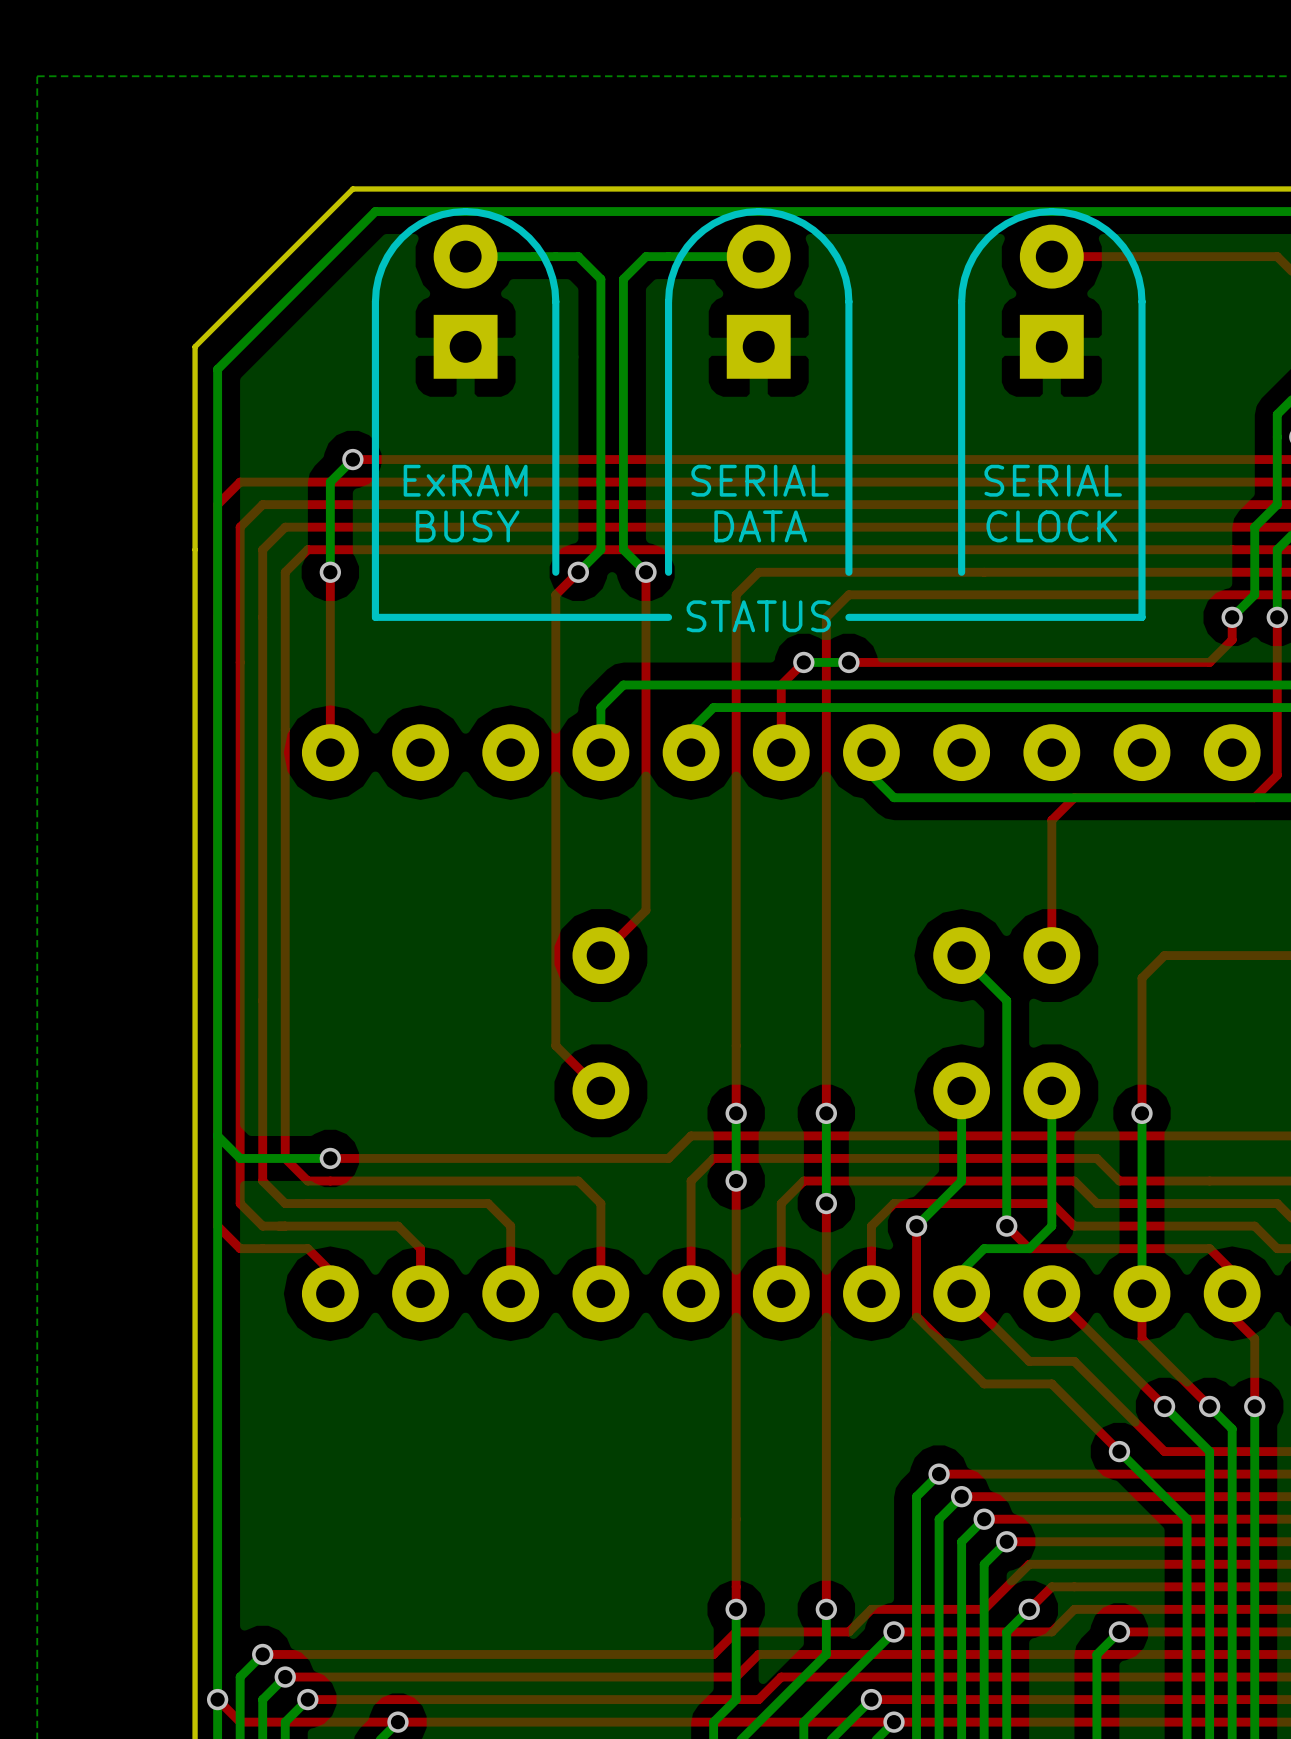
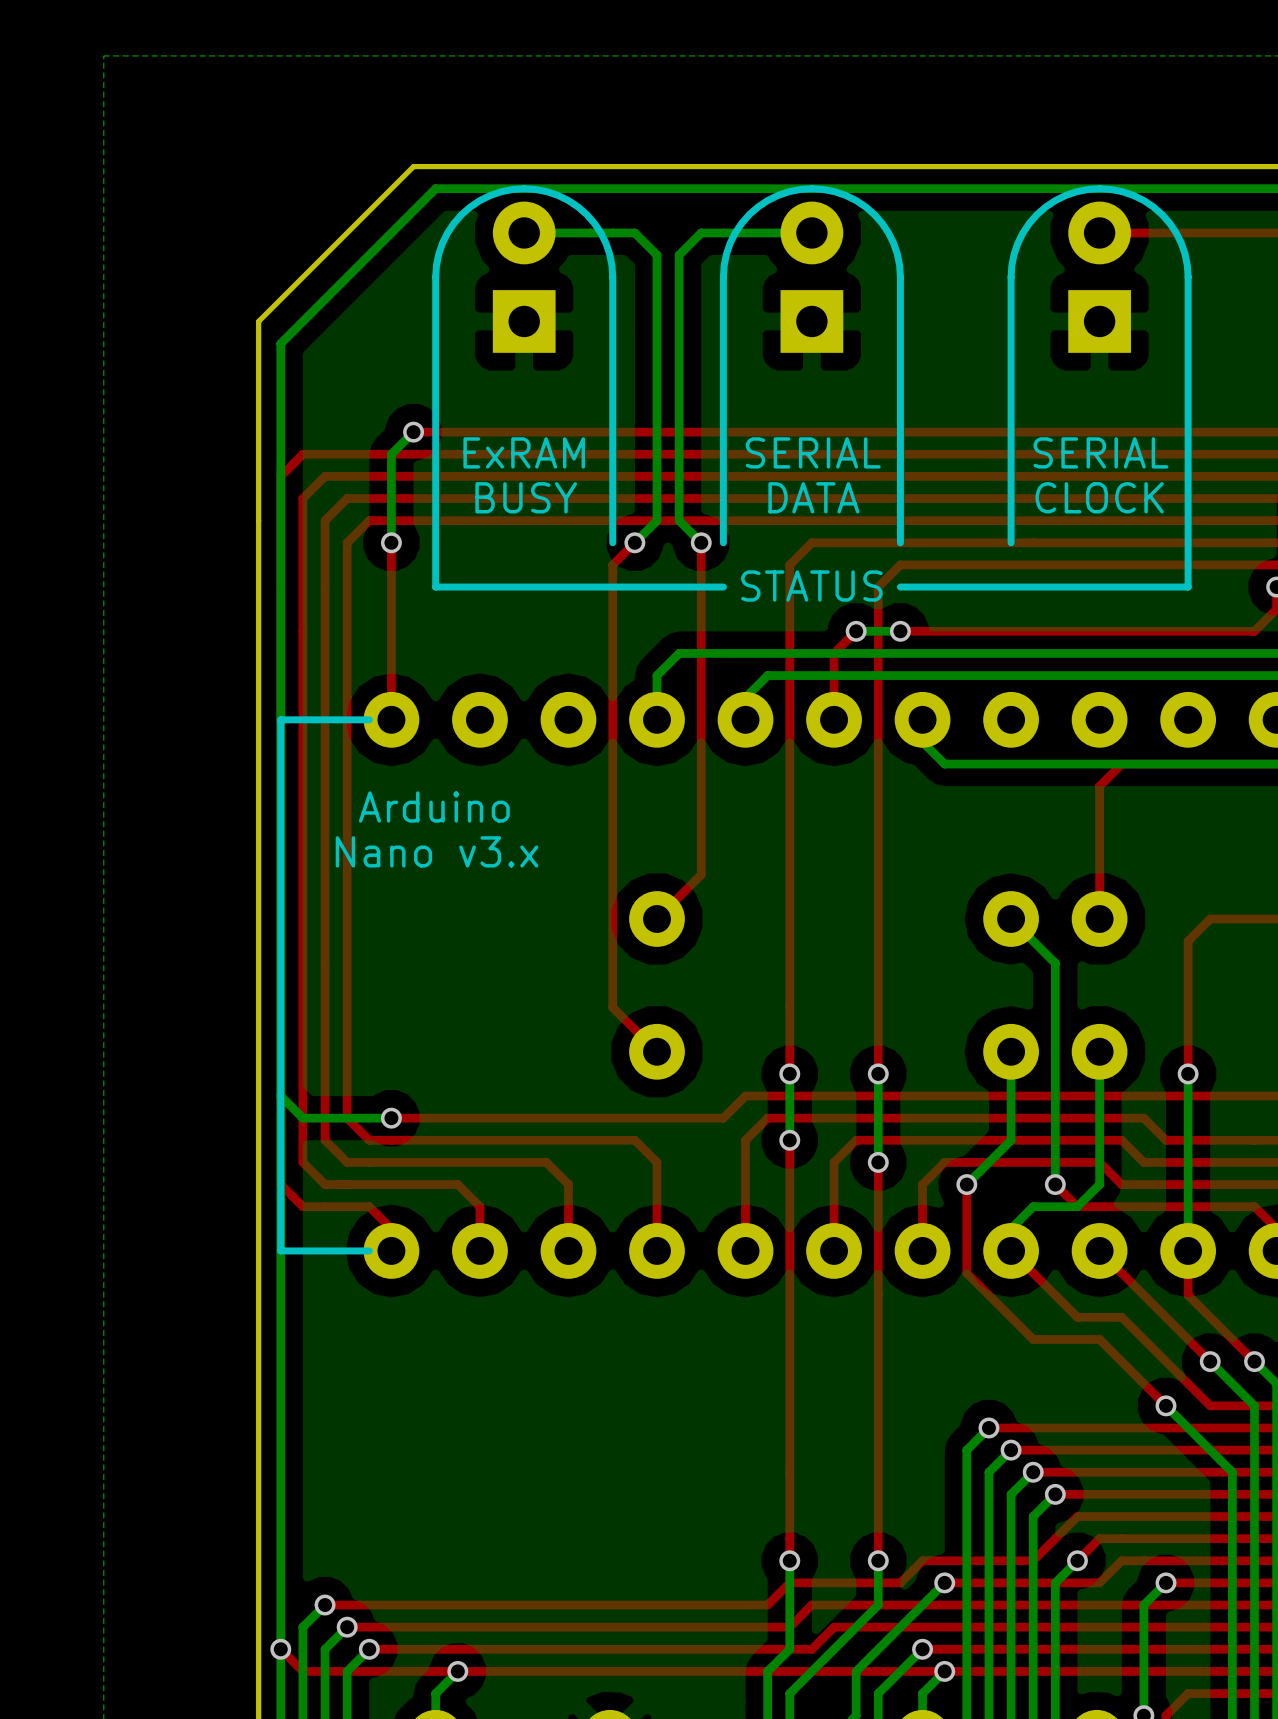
line: none -> (369, 719) (280, 719) (280, 1250) (369, 1250)
text: none -> Arduino (434, 806)
text: none -> Nano v3.x (437, 851)

